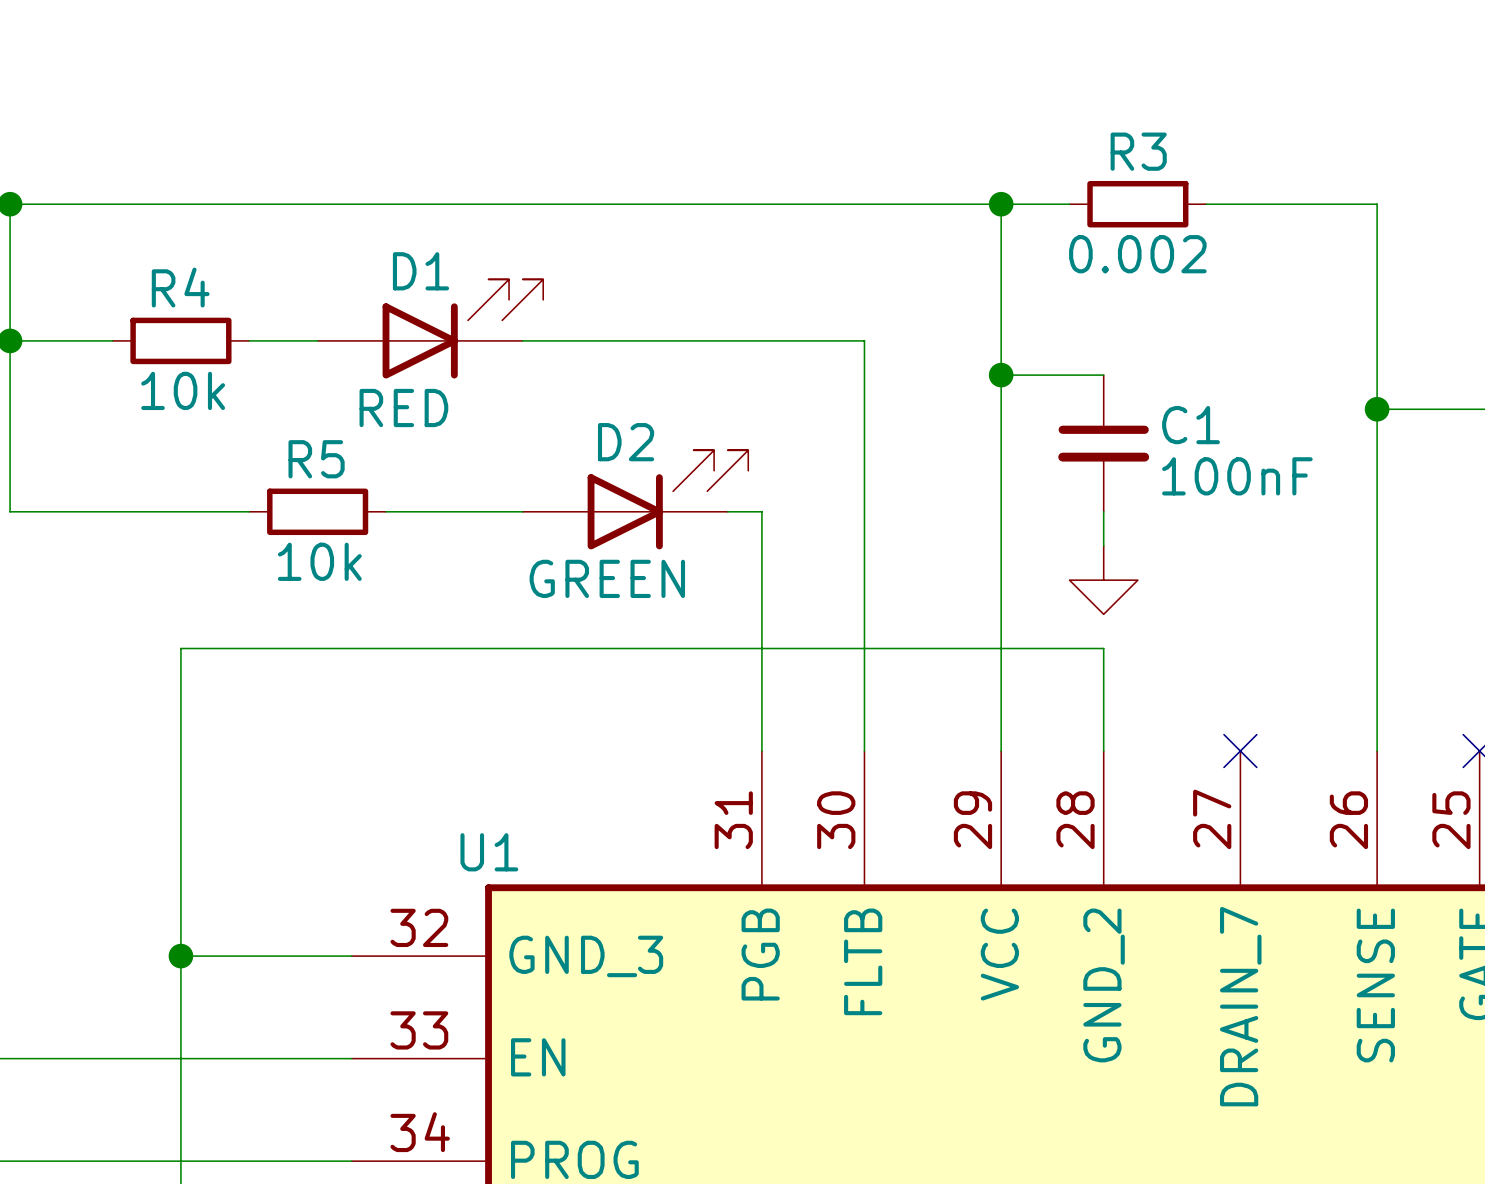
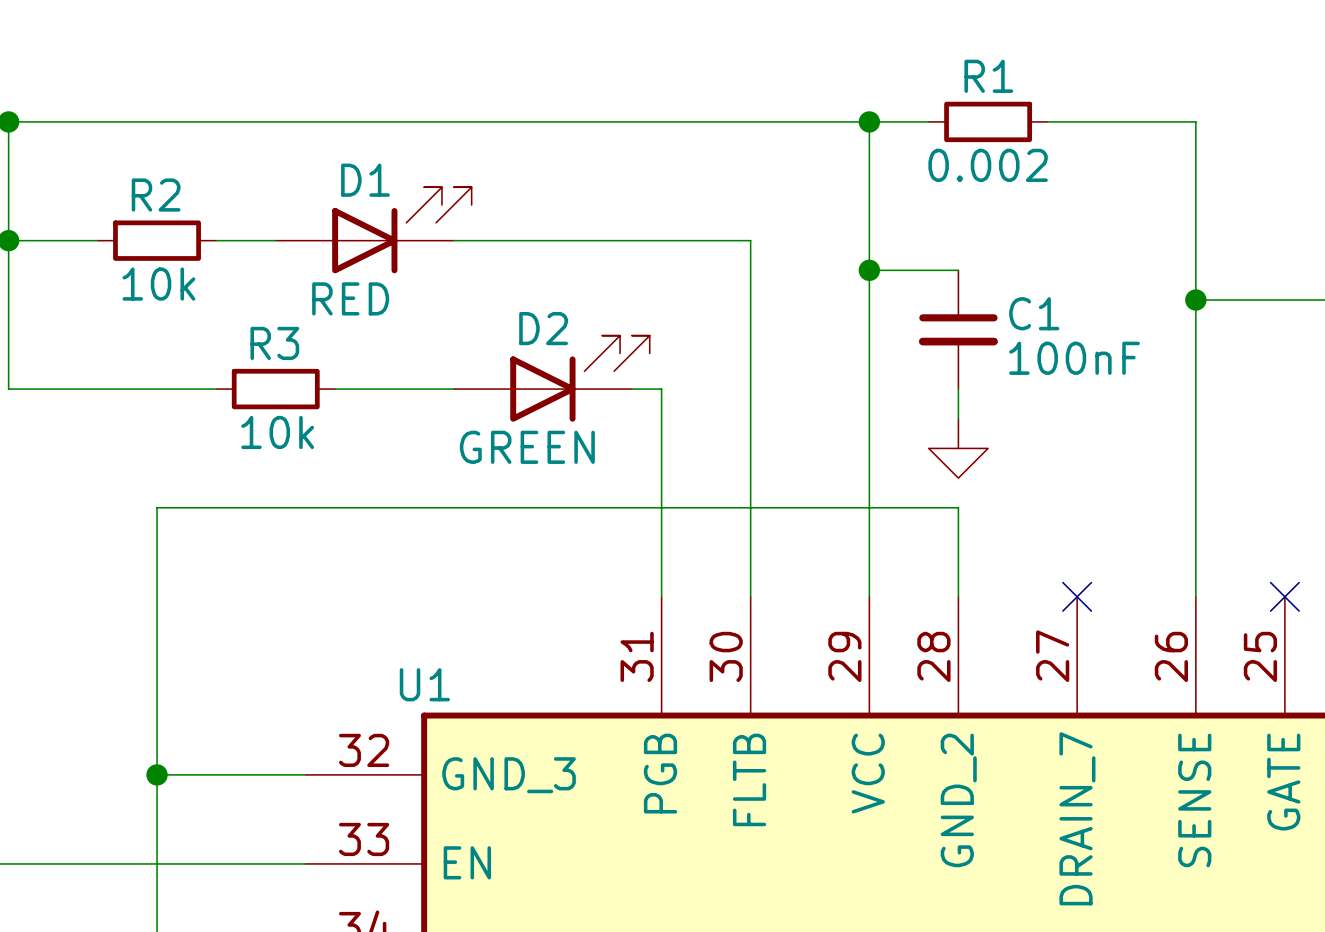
R3 name: R3 (1138, 151) -> R1 (988, 76)
R4 name: R4 (180, 287) -> R2 (156, 195)
R5 name: R5 (316, 459) -> R3 (274, 343)

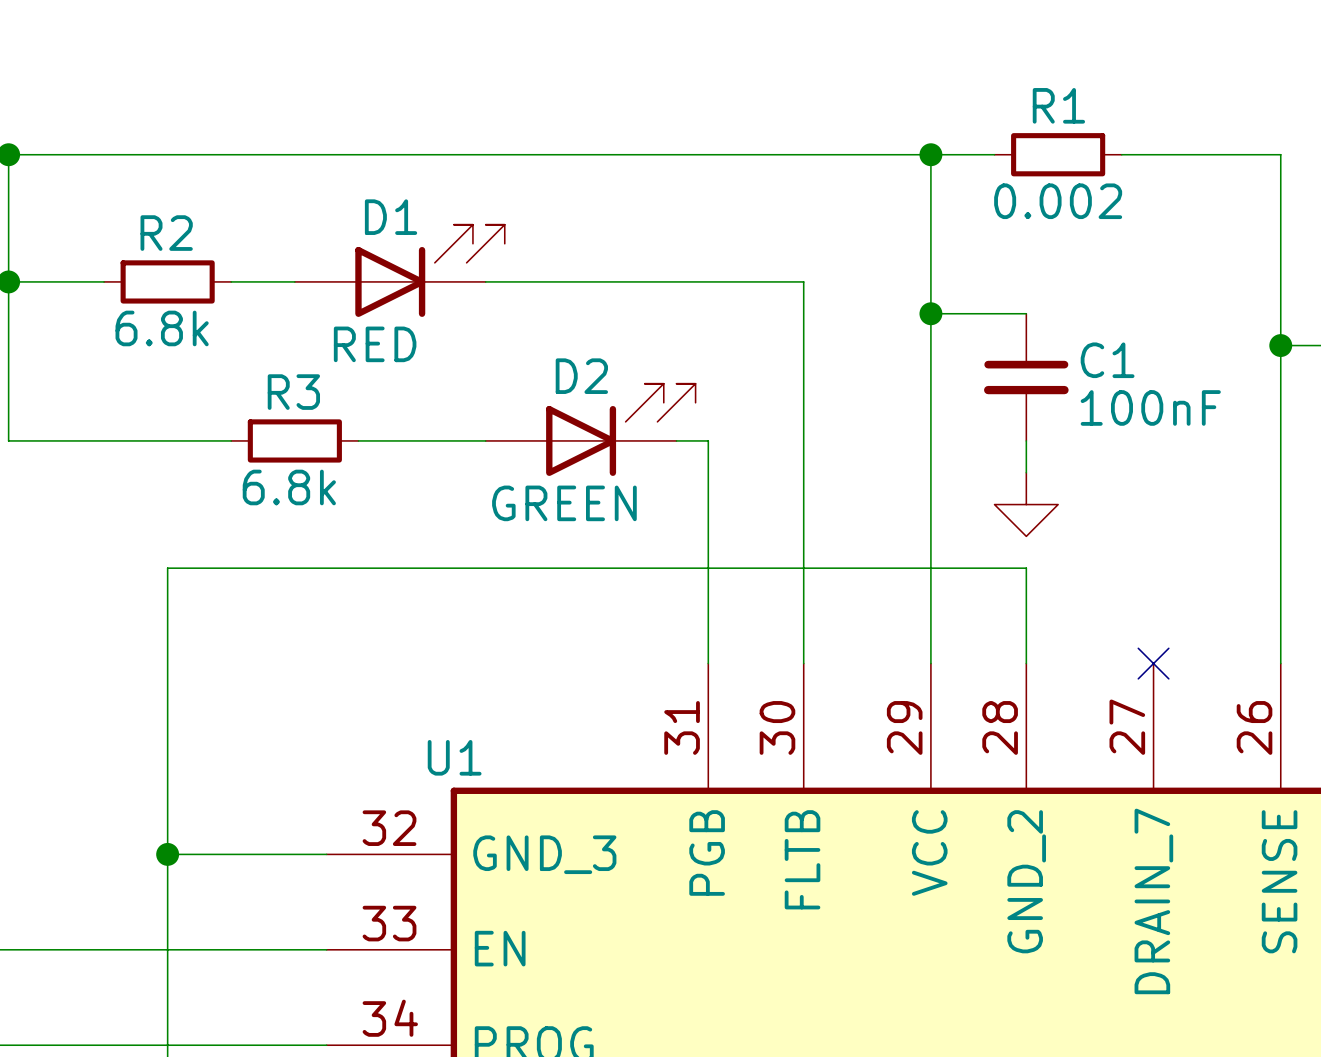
R2 value: 10k (158, 284) -> 6.8k (162, 328)
R3 value: 10k (277, 432) -> 6.8k (289, 487)

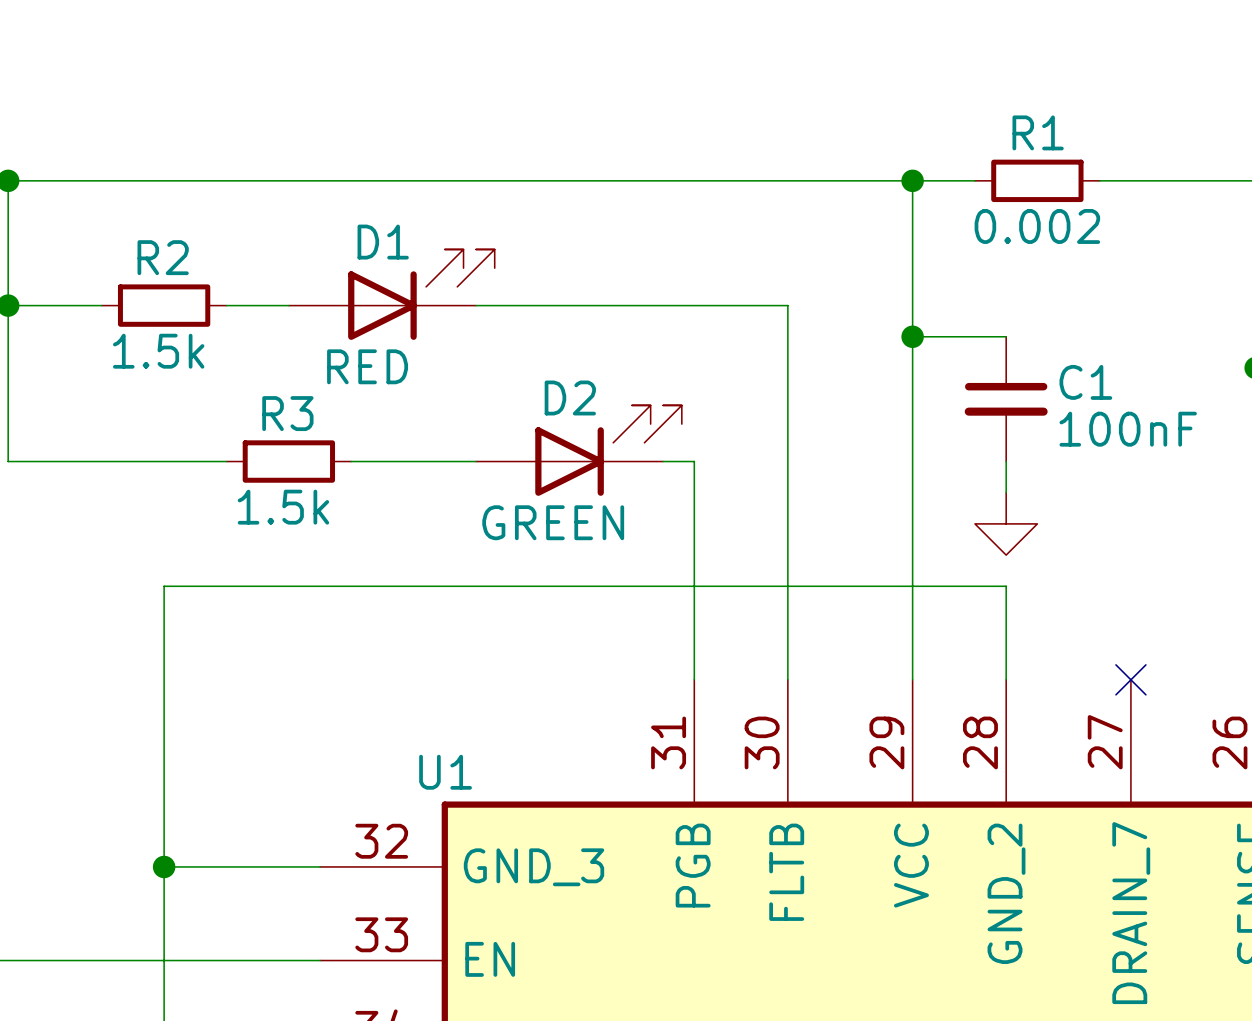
R2 value: 6.8k (162, 328) -> 1.5k (158, 351)
R3 value: 6.8k (289, 487) -> 1.5k (283, 507)

